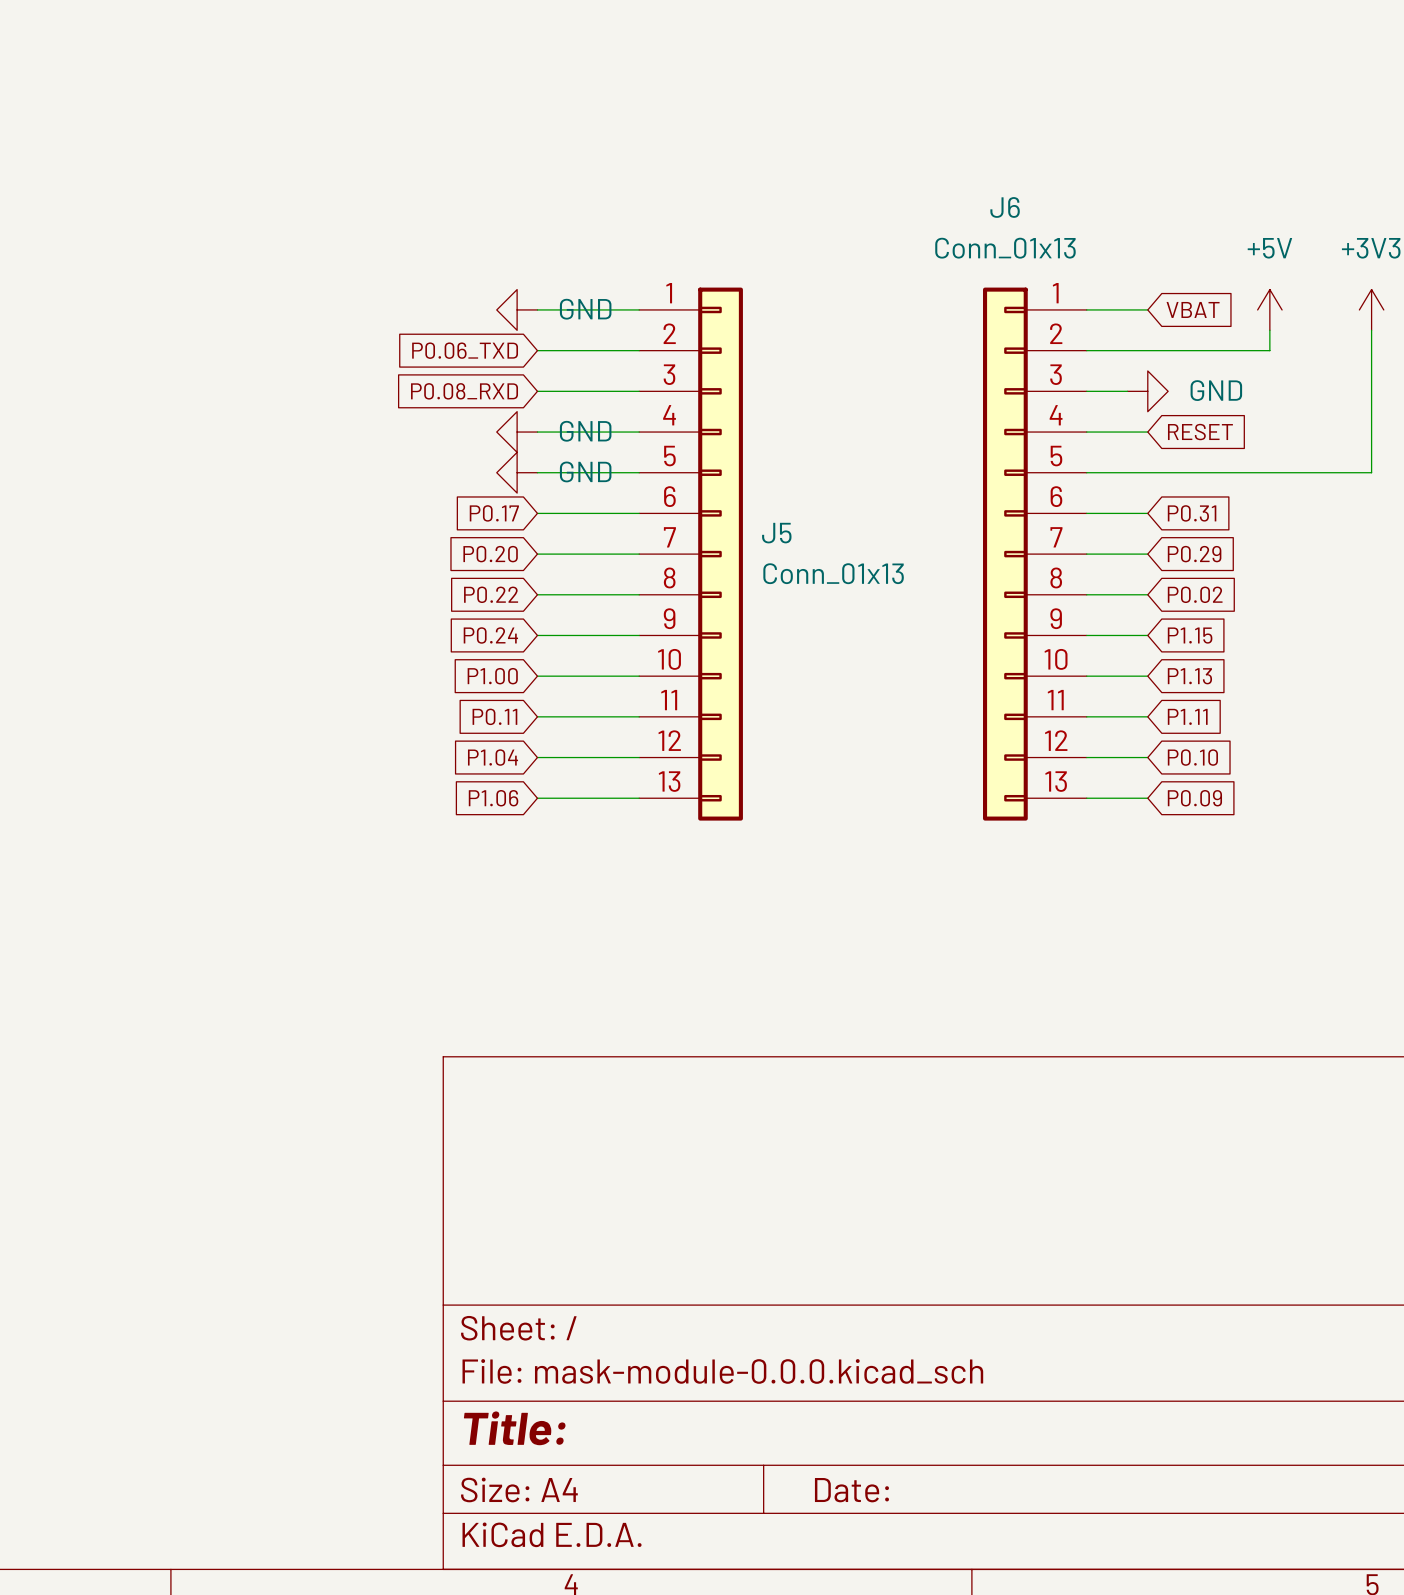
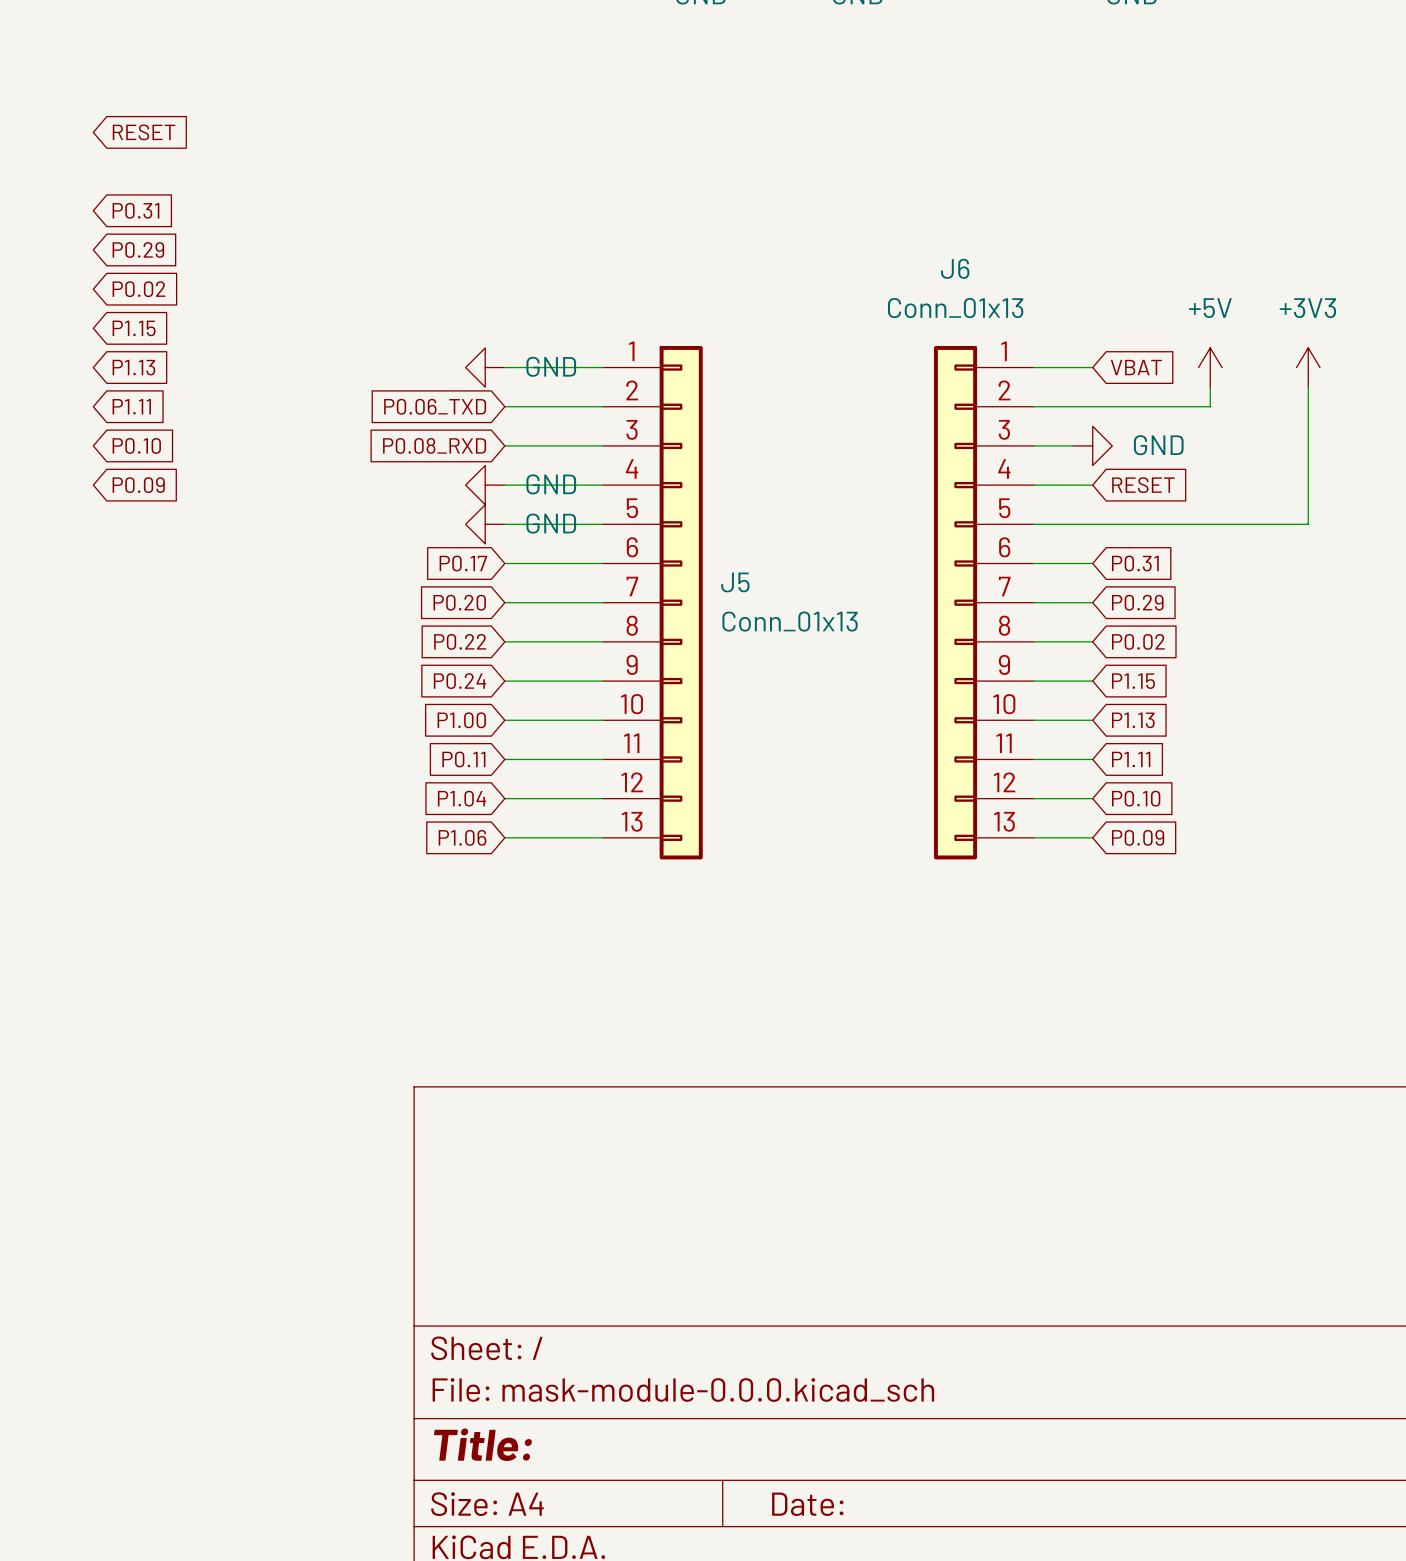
global label: none -> RESET (144, 132)
global label: none -> P0.31 (135, 210)
global label: none -> P0.29 (138, 249)
global label: none -> P0.02 (138, 289)
global label: none -> P1.15 (134, 328)
global label: none -> P1.13 (133, 367)
global label: none -> P1.11 (131, 406)
global label: none -> P0.10 (136, 445)
global label: none -> P0.09 (138, 485)

